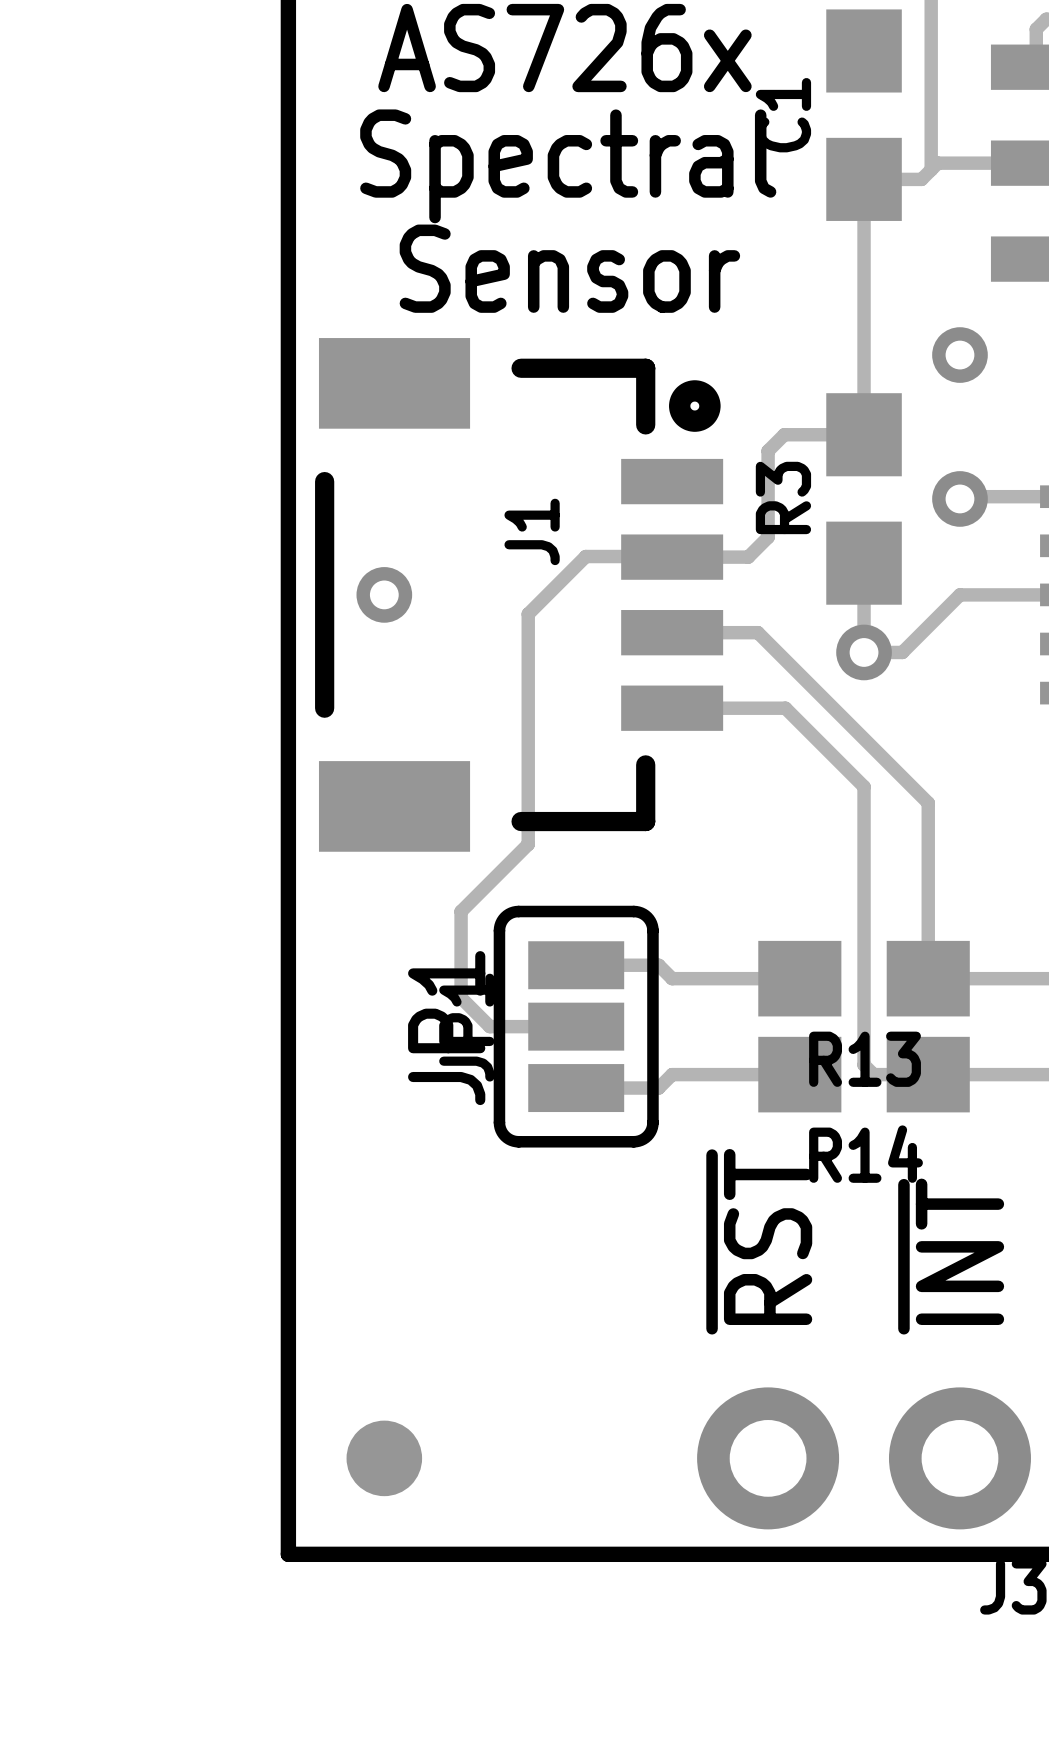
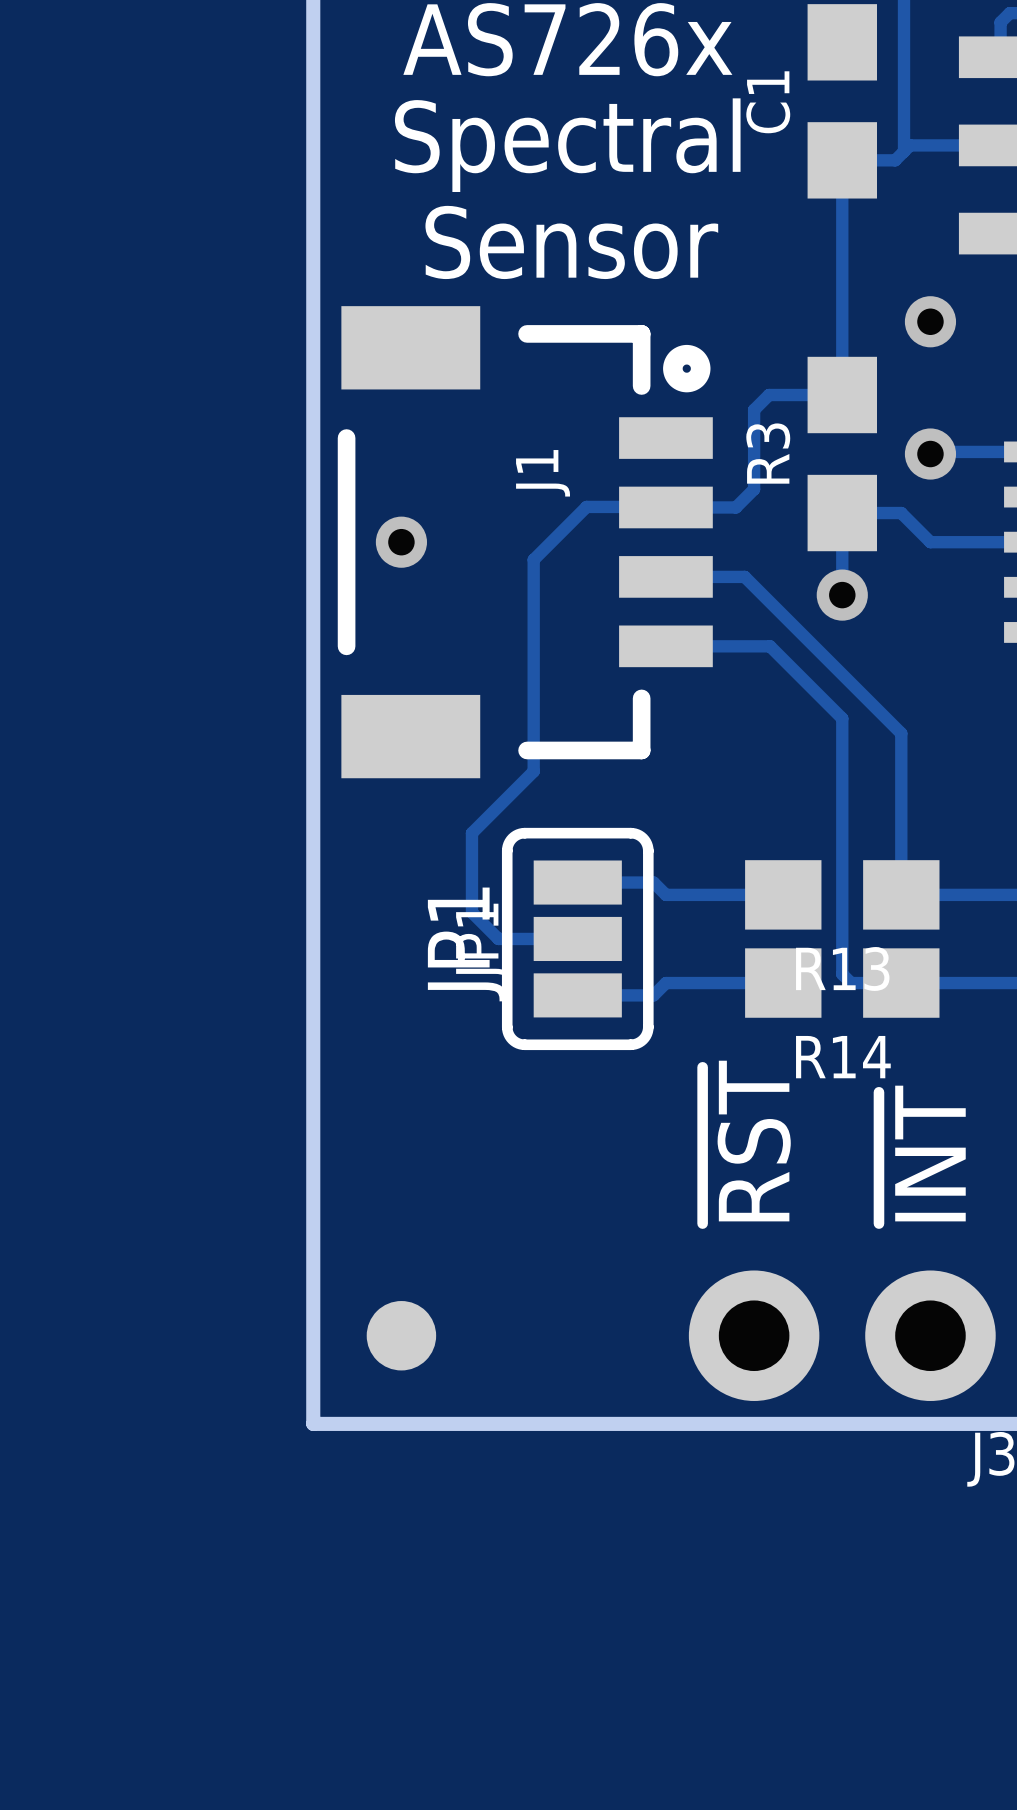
track: (959, 594) (902, 652) (864, 652) -> (930, 542) (901, 513) (842, 513)

